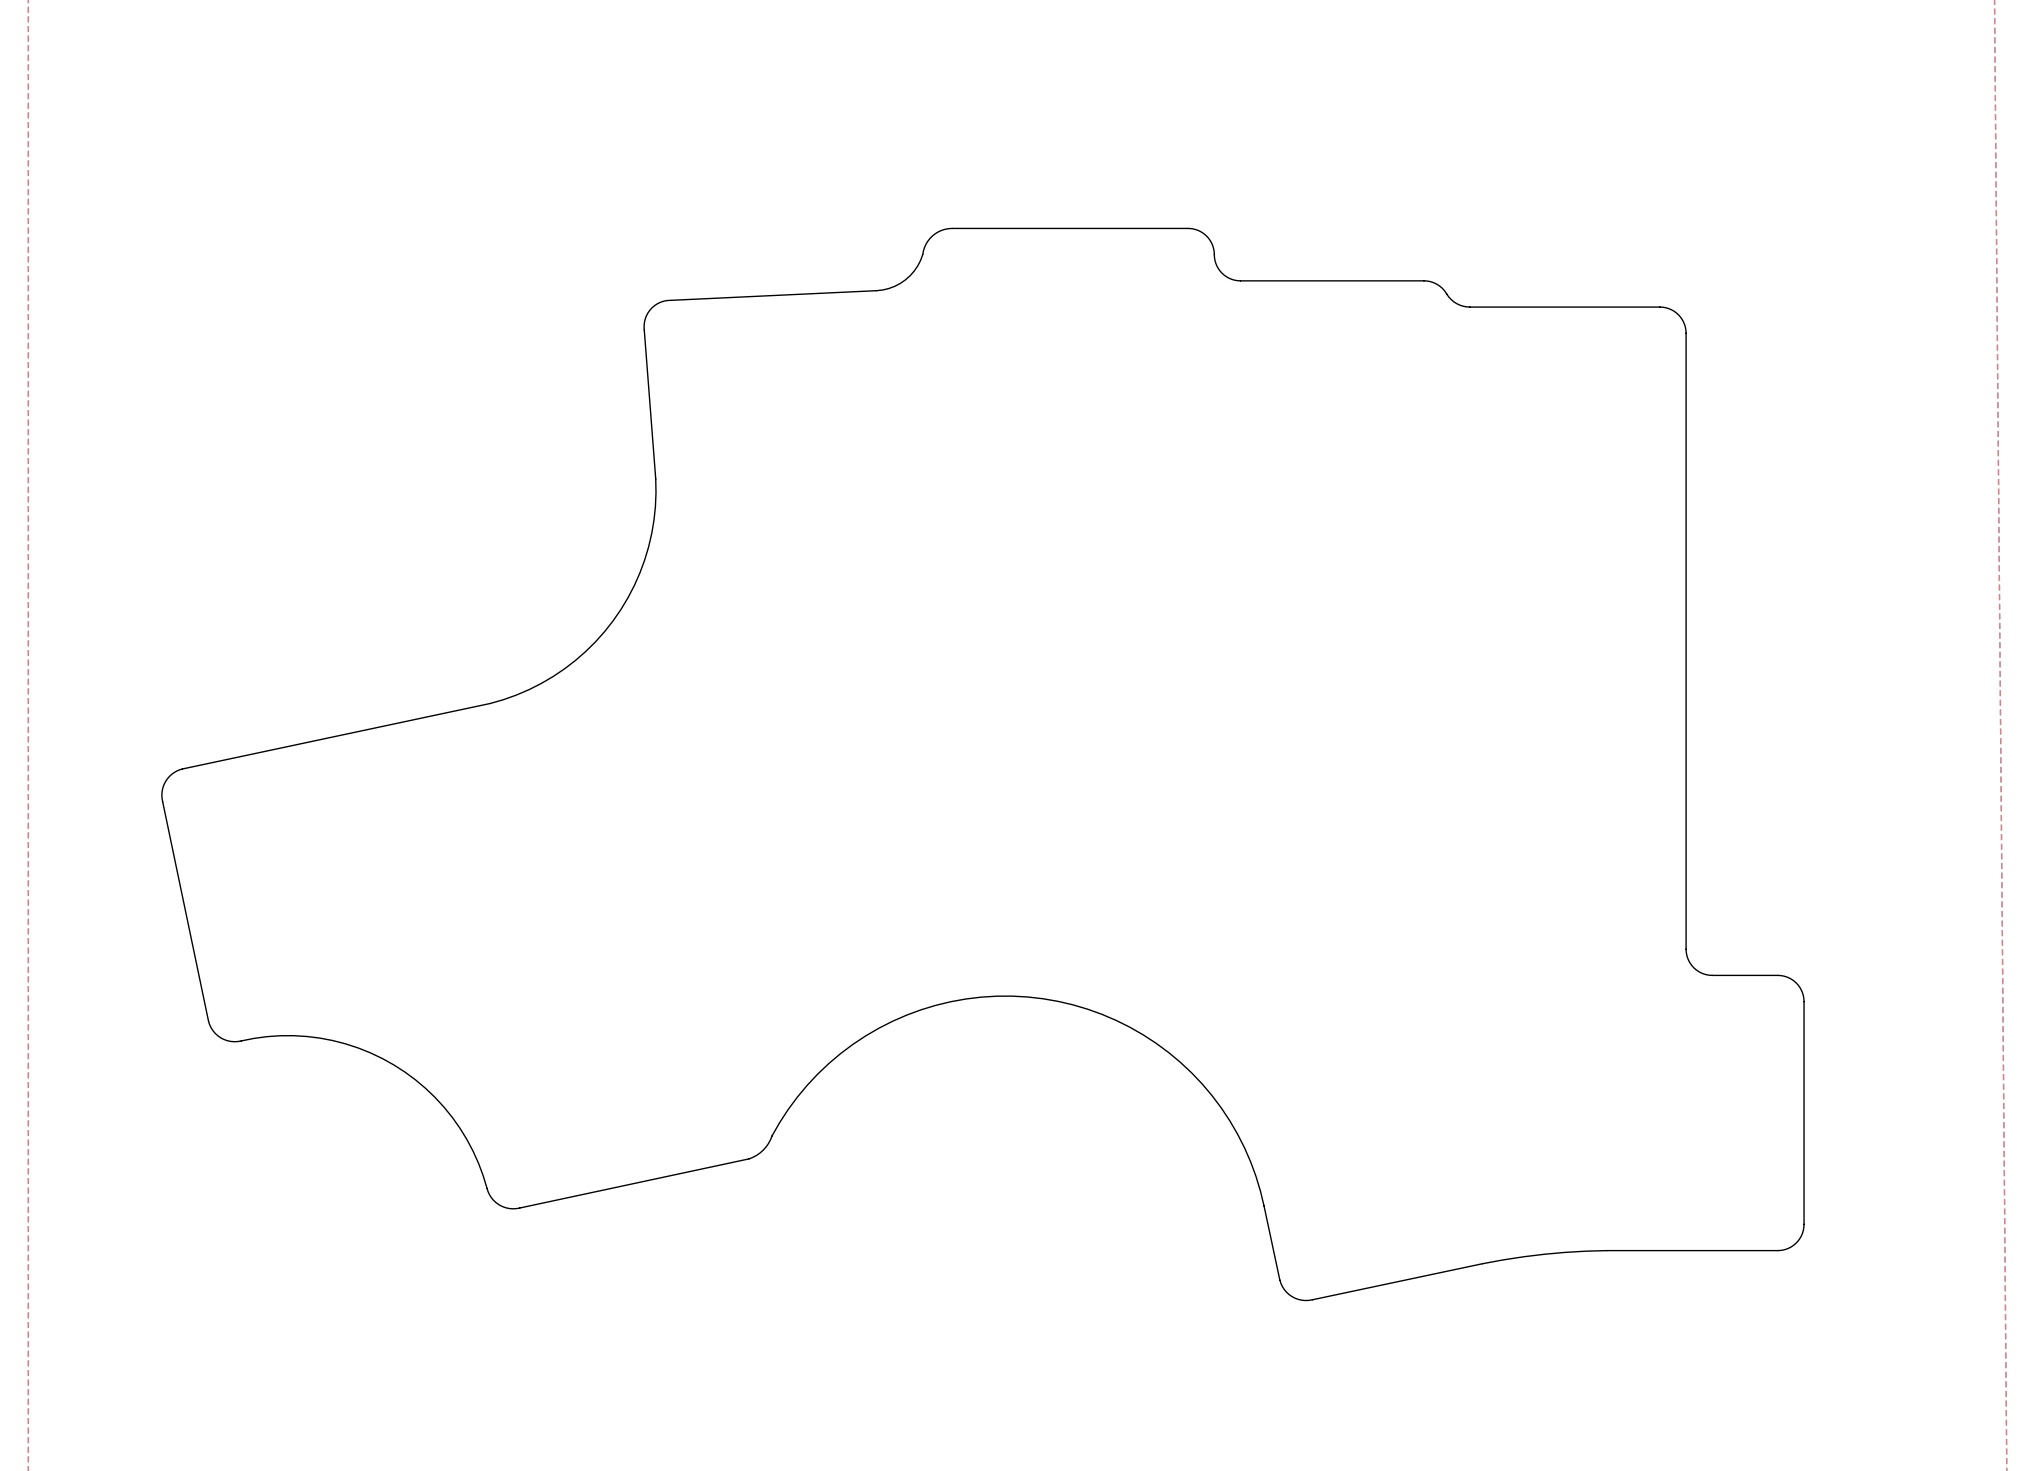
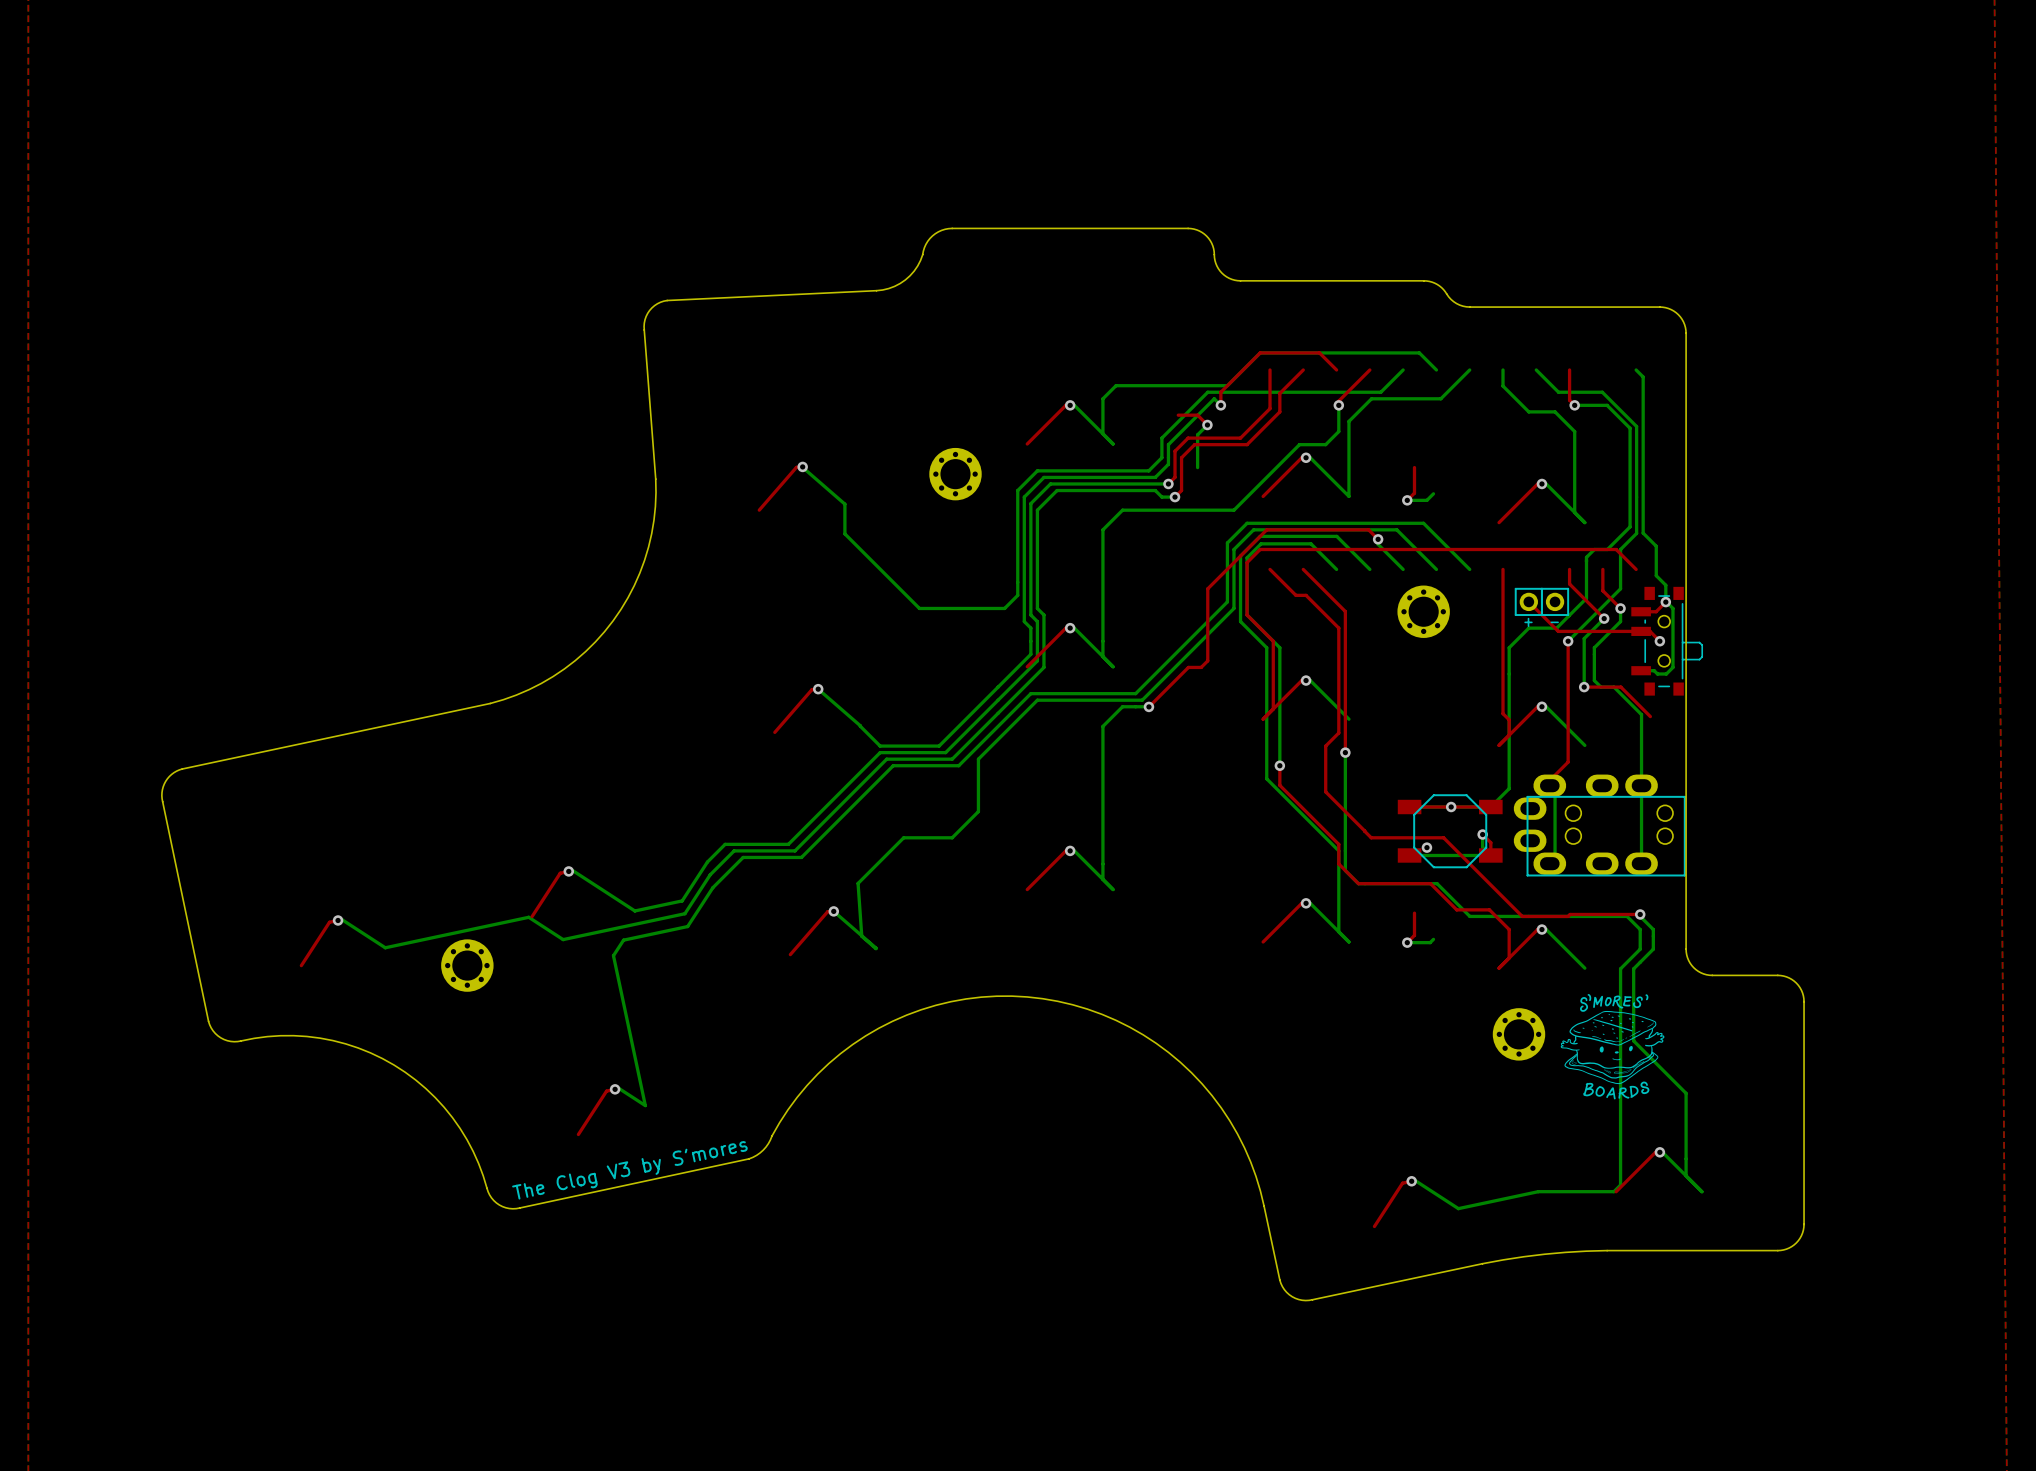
top track: none -> (1270, 369) (1270, 408) (1240, 438) (1188, 438) (1175, 451) (1175, 477) (1168, 483)
top track: none -> (1303, 369) (1279, 393) (1279, 411) (1247, 444) (1194, 444) (1181, 457) (1181, 490) (1175, 497)
top track: none -> (1336, 369) (1319, 352) (1260, 352) (1220, 392) (1220, 405)
top track: none -> (1369, 369) (1338, 401) (1338, 405)
bottom track: none -> (1403, 369) (1380, 392) (1207, 392) (1161, 438) (1161, 457) (1148, 470) (1037, 470) (1017, 490) (1017, 595) (1004, 608) (919, 608) (844, 533) (844, 504) (802, 466)
bottom track: none -> (1436, 369) (1419, 352) (1260, 352) (1227, 385) (1116, 385) (1102, 398) (1102, 433)
bottom track: none -> (1469, 369) (1440, 398) (1371, 398) (1348, 421) (1348, 496) (1310, 457) (1306, 457)
bottom track: none -> (1503, 369) (1503, 386) (1528, 411) (1555, 411) (1574, 431) (1574, 512)
bottom track: none -> (1536, 369) (1558, 392) (1602, 392) (1636, 426) (1636, 533) (1620, 549) (1620, 588) (1568, 641)
top track: none -> (1569, 369) (1569, 400) (1574, 405)
bottom track: none -> (1636, 369) (1643, 377) (1643, 533) (1656, 546) (1656, 575) (1665, 585) (1665, 602)
top track: none -> (1070, 405) (1065, 405) (1027, 444)
bottom track: none -> (1070, 405) (1074, 405) (1113, 444)
via: none -> (1070, 405)
bottom track: none -> (1220, 405) (1214, 398) (1168, 444) (1168, 464) (1155, 477) (1043, 477) (1024, 497) (1024, 621) (1030, 628) (1030, 654) (939, 746) (880, 746) (860, 725) (818, 689)
via: none -> (1220, 405)
bottom track: none -> (1338, 405) (1338, 431) (1325, 444) (1299, 444) (1233, 510) (1122, 510) (1102, 529) (1102, 656)
via: none -> (1338, 405)
bottom track: none -> (1574, 405) (1607, 405) (1630, 428) (1630, 526) (1607, 549) (1594, 549) (1586, 557) (1586, 598) (1556, 628) (1528, 628) (1509, 647) (1509, 788) (1490, 807) (1409, 807)
via: none -> (1574, 405)
top track: none -> (1178, 415) (1197, 415) (1207, 425)
bottom track: none -> (1207, 425) (1197, 434) (1197, 467)
via: none -> (1207, 425)
top track: none -> (1306, 457) (1301, 457) (1263, 496)
via: none -> (1306, 457)
top track: none -> (802, 466) (796, 467) (759, 510)
via: none -> (802, 466)
top track: none -> (1414, 467) (1414, 493) (1407, 500)
part: none -> (955, 474)
bottom track: none -> (1168, 483) (1050, 483) (1030, 503) (1030, 615) (1037, 621) (1037, 660) (945, 752) (880, 752) (788, 844) (725, 844) (707, 862) (682, 900) (634, 910) (572, 870) (568, 871)
via: none -> (1168, 483)
top track: none -> (1541, 483) (1537, 483) (1499, 522)
bottom track: none -> (1541, 483) (1546, 483) (1584, 522)
via: none -> (1541, 483)
bottom track: none -> (1433, 493) (1426, 500) (1407, 500)
bottom track: none -> (1175, 497) (1161, 497) (1155, 490) (1057, 490) (1037, 510) (1037, 608) (1043, 615) (1043, 667) (952, 759) (886, 759) (794, 850) (734, 850) (710, 874) (684, 913) (563, 939) (528, 917) (385, 947) (341, 919) (338, 920)
via: none -> (1175, 497)
via: none -> (1407, 500)
top track: none -> (1378, 539) (1368, 529) (1266, 529) (1207, 588) (1207, 660) (1201, 667) (1188, 667) (1148, 706)
bottom track: none -> (1378, 539) (1378, 544) (1403, 569)
via: none -> (1378, 539)
top track: none -> (1270, 569) (1295, 595) (1306, 595) (1338, 628) (1338, 732) (1325, 746) (1325, 791) (1371, 837) (1443, 837) (1522, 916) (1640, 914)
top track: none -> (1303, 569) (1345, 611) (1345, 752)
bottom track: none -> (1336, 569) (1310, 543) (1261, 543) (1247, 557) (1247, 615) (1279, 647) (1279, 765)
bottom track: none -> (1369, 569) (1336, 536) (1260, 536) (1240, 556) (1240, 621) (1266, 647) (1266, 778) (1338, 850) (1338, 931)
bottom track: none -> (1436, 569) (1396, 529) (1253, 529) (1233, 549) (1233, 608) (1142, 700) (1037, 700) (978, 759) (978, 811) (952, 837) (903, 837) (858, 883) (861, 936) (875, 948) (875, 948) (833, 911)
bottom track: none -> (1469, 569) (1423, 523) (1247, 523) (1227, 542) (1227, 601) (1135, 693) (1030, 693) (958, 765) (893, 765) (801, 857) (743, 857) (712, 887) (687, 926) (623, 940) (613, 955) (645, 1105) (619, 1088) (615, 1089)
top track: none -> (1503, 569) (1503, 713) (1509, 719) (1509, 735)
top track: none -> (1569, 569) (1569, 584) (1604, 618)
top track: none -> (1602, 569) (1602, 590) (1620, 608)
top track: none -> (1636, 569) (1616, 549) (1260, 549) (1247, 562) (1247, 615) (1273, 641) (1273, 709)
top track: none -> (1528, 601) (1558, 631) (1650, 631) (1659, 641)
part: none -> (1528, 601)
part: none -> (1555, 601)
bottom track: none -> (1666, 601) (1672, 608) (1672, 667) (1666, 673) (1657, 673) (1654, 670) (1641, 670)
top track: none -> (1665, 602) (1656, 611) (1641, 611)
via: none -> (1665, 602)
bottom track: none -> (1620, 608) (1620, 621) (1594, 647) (1594, 680) (1600, 687) (1614, 687) (1641, 714) (1641, 863)
via: none -> (1620, 608)
part: none -> (1423, 611)
bottom track: none -> (1604, 618) (1584, 638) (1584, 687)
via: none -> (1604, 618)
text: none -> + (1528, 622)
text: none -> - (1554, 622)
top track: none -> (1070, 628) (1065, 628) (1027, 666)
bottom track: none -> (1070, 628) (1074, 628) (1113, 666)
via: none -> (1070, 628)
top track: none -> (1568, 641) (1568, 762) (1549, 780) (1549, 785)
via: none -> (1568, 641)
via: none -> (1659, 641)
part: none -> (1667, 641)
top track: none -> (1306, 680) (1301, 680) (1263, 719)
bottom track: none -> (1306, 680) (1310, 680) (1348, 719)
via: none -> (1306, 680)
top track: none -> (1584, 687) (1620, 687) (1650, 716)
via: none -> (1584, 687)
top track: none -> (818, 689) (812, 689) (774, 732)
via: none -> (818, 689)
bottom track: none -> (1148, 706) (1122, 706) (1102, 726) (1102, 879)
via: none -> (1148, 706)
top track: none -> (1541, 706) (1537, 706) (1499, 745)
bottom track: none -> (1541, 706) (1546, 706) (1584, 745)
via: none -> (1541, 706)
bottom track: none -> (1345, 752) (1345, 870) (1358, 883) (1437, 883) (1469, 916) (1627, 916) (1640, 929) (1640, 949) (1620, 968) (1620, 1185) (1613, 1191) (1538, 1191) (1458, 1208) (1415, 1180) (1411, 1181)
via: none -> (1345, 752)
top track: none -> (1279, 765) (1279, 785) (1338, 844) (1338, 864) (1358, 883) (1430, 883) (1456, 909) (1489, 909) (1509, 929) (1509, 958)
via: none -> (1279, 765)
bottom track: none -> (1549, 785) (1555, 790) (1555, 858) (1549, 863)
top track: none -> (1409, 807) (1490, 807)
via: none -> (1451, 807)
part: none -> (1599, 825)
part: none -> (1450, 831)
top track: none -> (1482, 834) (1490, 842) (1490, 855)
bottom track: none -> (1482, 834) (1482, 847) (1490, 855) (1409, 855)
via: none -> (1482, 834)
via: none -> (1426, 847)
top track: none -> (1070, 850) (1065, 850) (1027, 889)
bottom track: none -> (1070, 850) (1074, 850) (1113, 889)
via: none -> (1070, 850)
top track: none -> (568, 871) (560, 873) (532, 916)
via: none -> (568, 871)
top track: none -> (1306, 903) (1301, 903) (1263, 941)
bottom track: none -> (1306, 903) (1310, 903) (1348, 941)
via: none -> (1306, 903)
top track: none -> (833, 911) (827, 911) (790, 954)
via: none -> (833, 911)
top track: none -> (1414, 913) (1414, 935) (1407, 942)
bottom track: none -> (1640, 914) (1653, 929) (1653, 949) (1633, 968) (1633, 1040) (1686, 1093) (1686, 1175)
via: none -> (1640, 914)
top track: none -> (338, 920) (329, 922) (301, 965)
via: none -> (338, 920)
top track: none -> (1541, 929) (1537, 929) (1499, 968)
bottom track: none -> (1541, 929) (1546, 929) (1584, 968)
via: none -> (1541, 929)
bottom track: none -> (1433, 939) (1430, 942) (1407, 942)
via: none -> (1407, 942)
part: none -> (467, 965)
drawing: none -> [1560, 994, 1665, 1100]
part: none -> (1519, 1034)
top track: none -> (615, 1089) (606, 1091) (578, 1134)
via: none -> (615, 1089)
top track: none -> (1659, 1152) (1655, 1152) (1616, 1191)
bottom track: none -> (1659, 1152) (1662, 1152) (1701, 1191)
via: none -> (1659, 1152)
text: none -> The Clog V3 by S'mores (629, 1170)
top track: none -> (1411, 1181) (1402, 1183) (1374, 1226)
via: none -> (1411, 1181)

